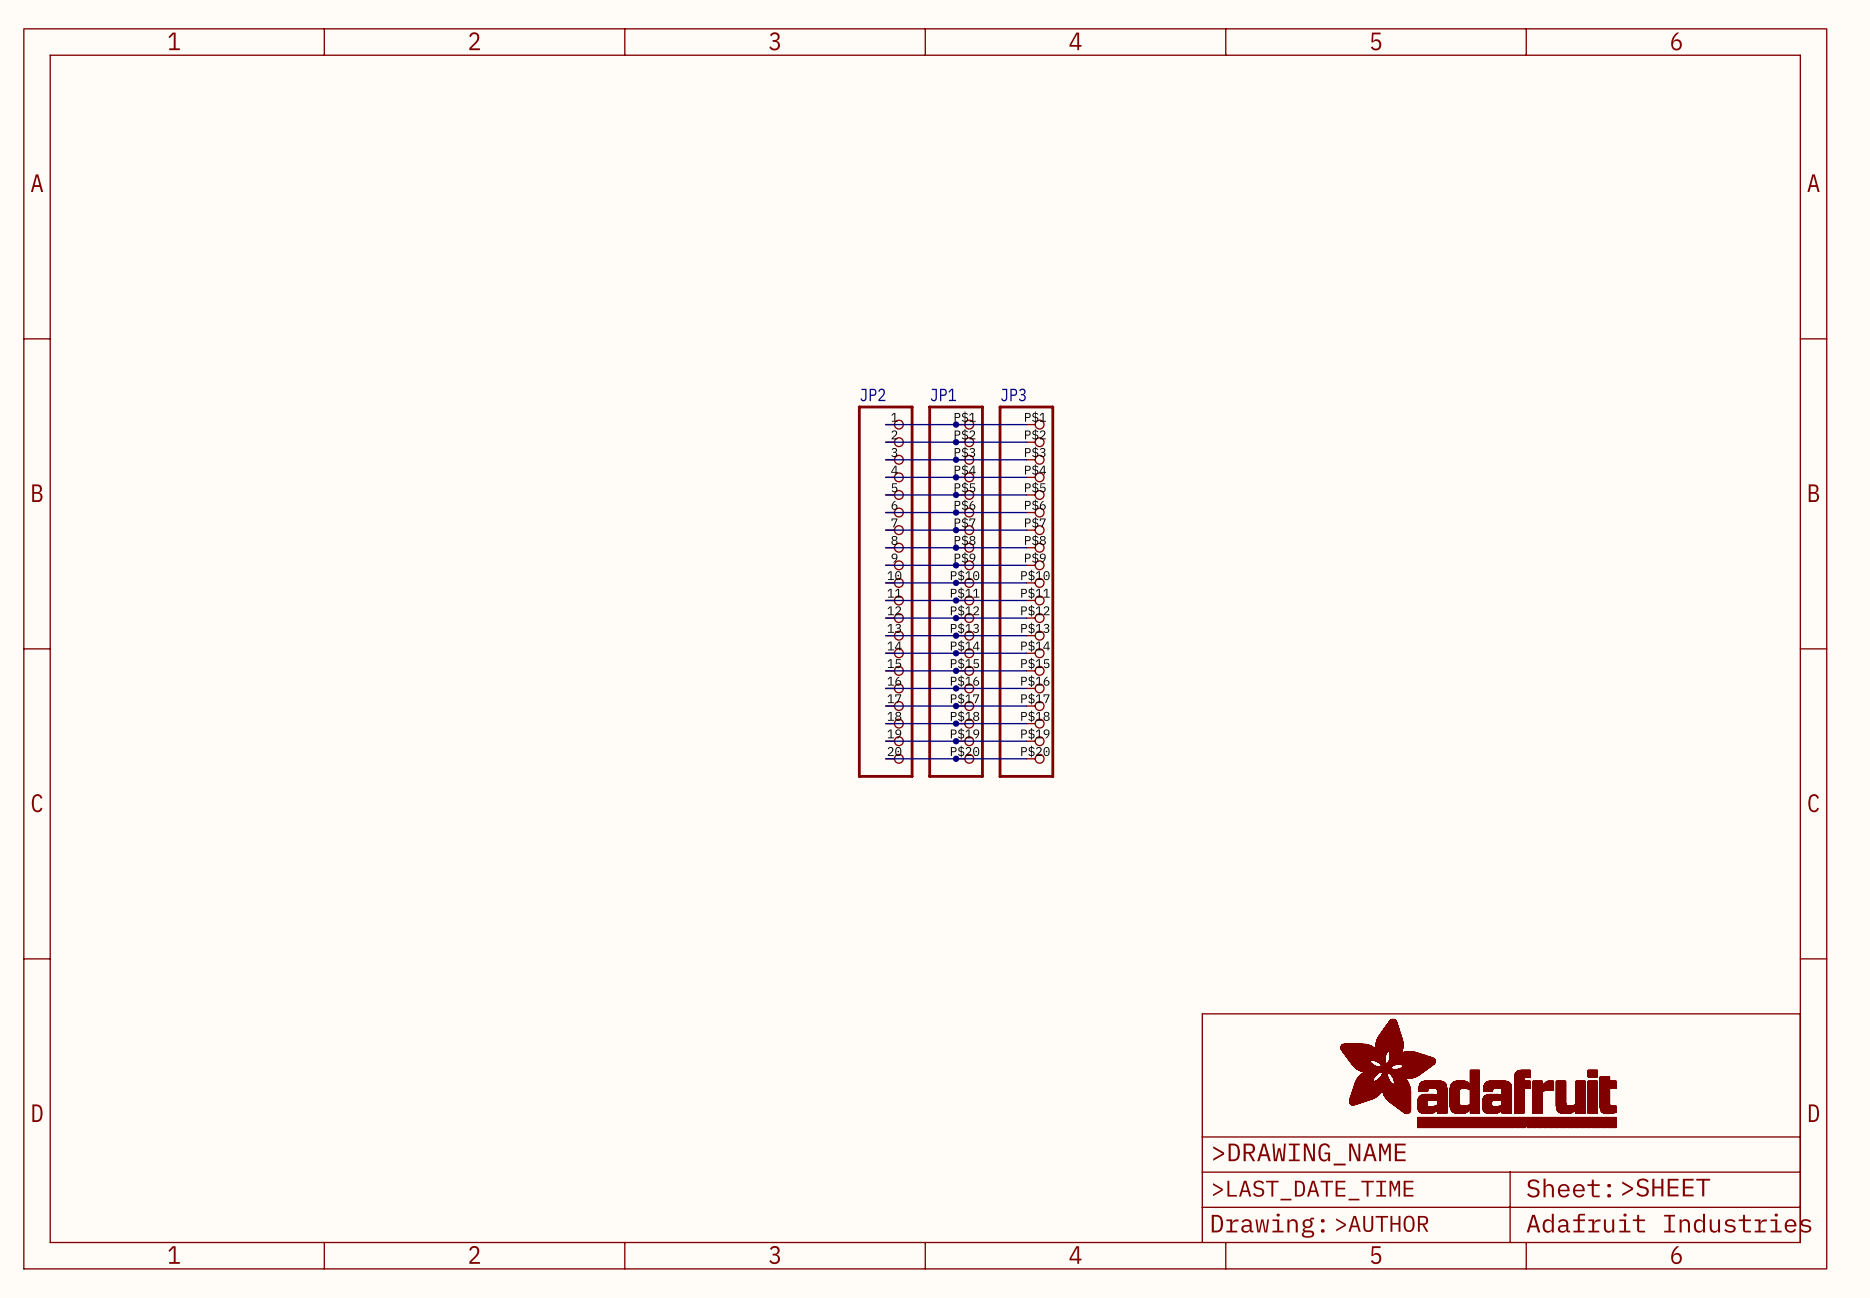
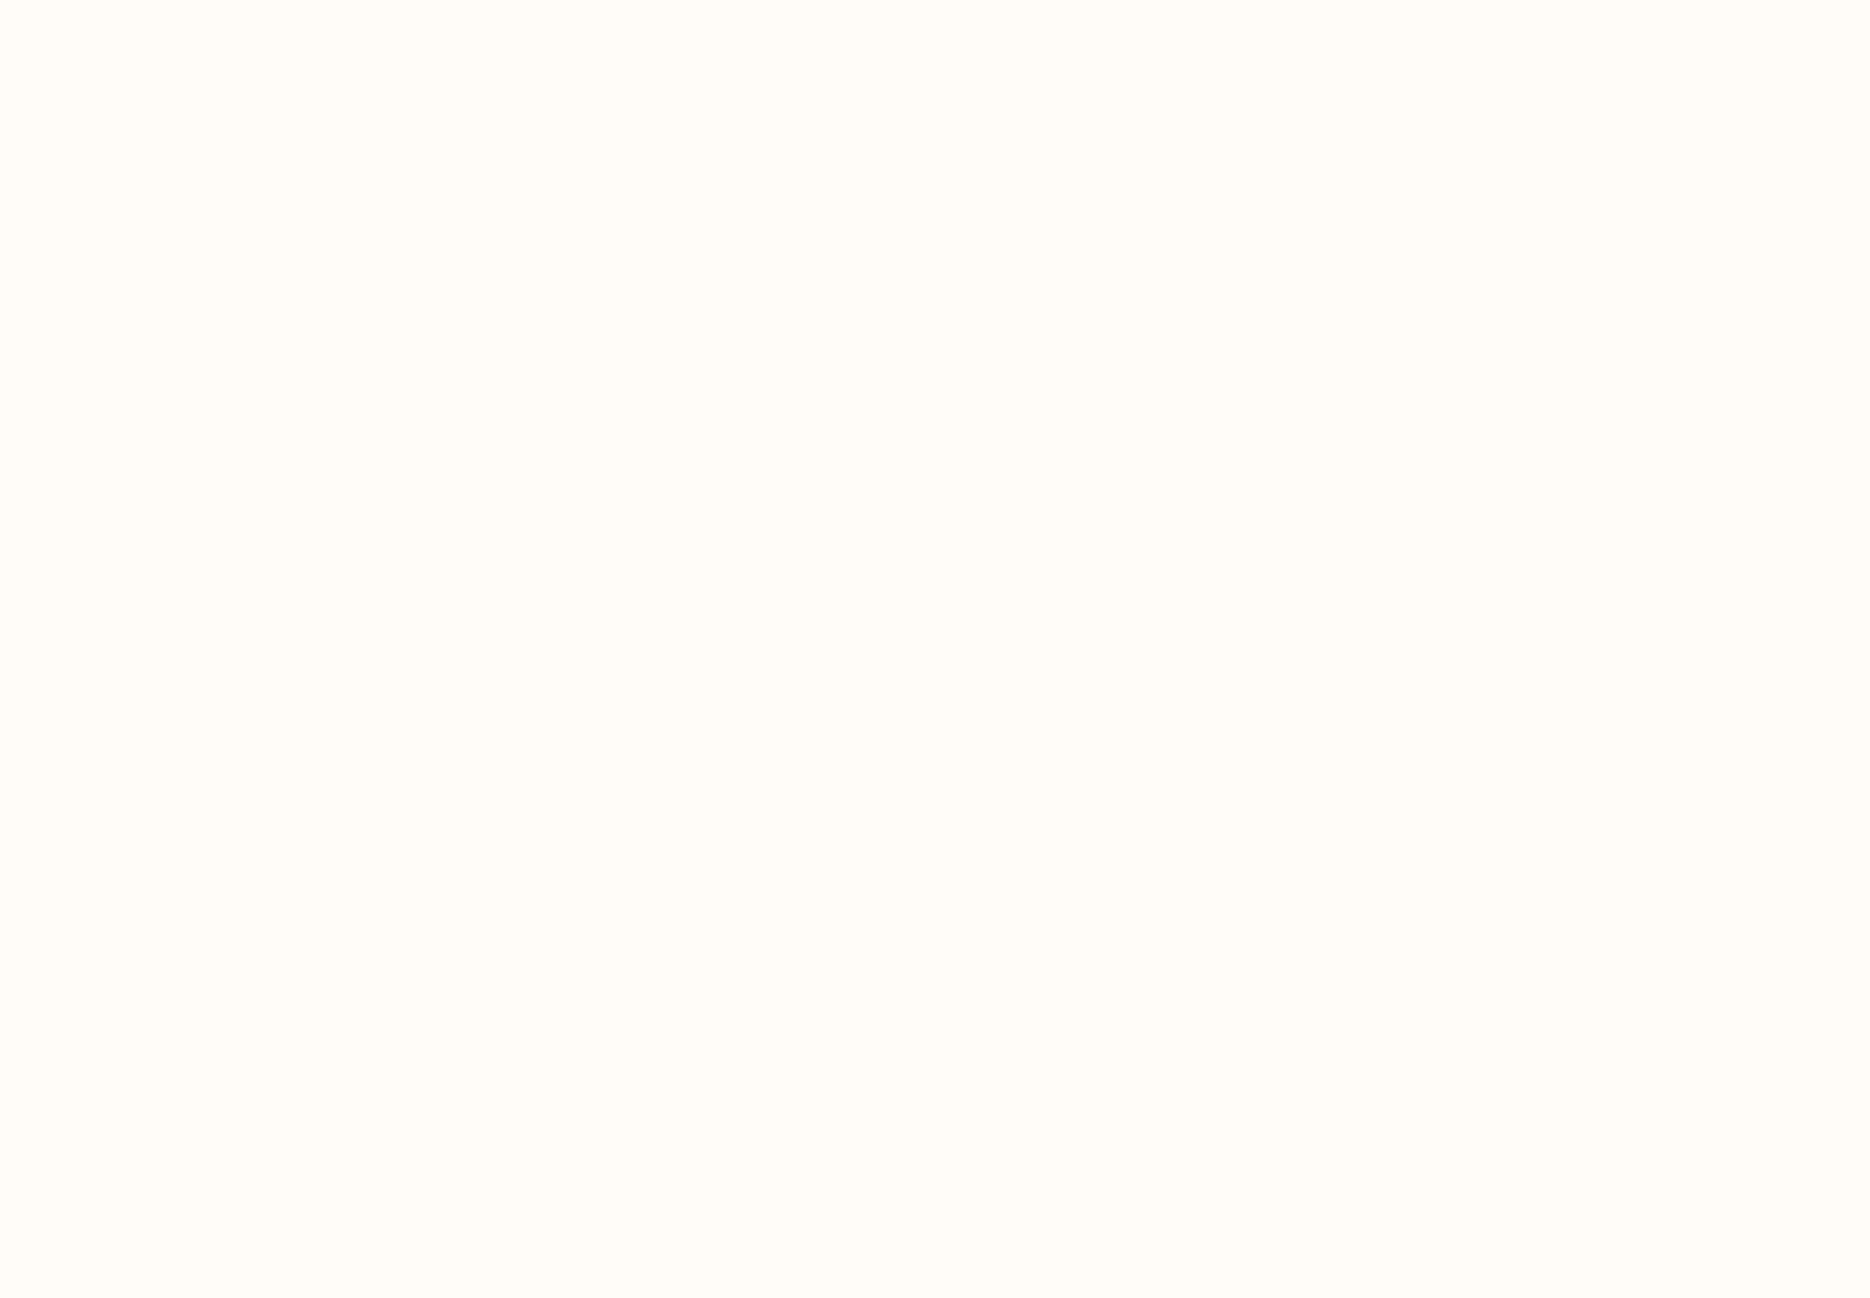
wire: (885, 424) (1026, 424) -> none
junction: (956, 424) -> none
wire: (885, 442) (1026, 442) -> none
junction: (956, 442) -> none
wire: (885, 459) (1026, 459) -> none
junction: (956, 459) -> none
wire: (885, 477) (1026, 477) -> none
junction: (956, 477) -> none
wire: (885, 494) (1026, 494) -> none
junction: (956, 494) -> none
wire: (885, 512) (1026, 512) -> none
junction: (956, 512) -> none
wire: (885, 530) (1026, 530) -> none
junction: (956, 530) -> none
wire: (885, 547) (1026, 547) -> none
junction: (956, 547) -> none
wire: (885, 565) (1026, 565) -> none
junction: (956, 565) -> none
wire: (885, 582) (1026, 582) -> none
junction: (956, 582) -> none
JP2: (885, 591) -> none
JP1: (956, 591) -> none
JP3: (1026, 591) -> none
wire: (885, 600) (1026, 600) -> none
junction: (956, 600) -> none
wire: (885, 618) (1026, 618) -> none
junction: (956, 618) -> none
wire: (885, 635) (1026, 635) -> none
junction: (956, 635) -> none
power symbol: (925, 648) -> none
wire: (885, 653) (1026, 653) -> none
junction: (956, 653) -> none
wire: (885, 670) (1026, 670) -> none
junction: (956, 670) -> none
wire: (885, 688) (1026, 688) -> none
junction: (956, 688) -> none
wire: (885, 706) (1026, 706) -> none
junction: (956, 706) -> none
wire: (885, 723) (1026, 723) -> none
junction: (956, 723) -> none
wire: (885, 741) (1026, 741) -> none
junction: (956, 741) -> none
wire: (885, 758) (1026, 758) -> none
junction: (956, 758) -> none

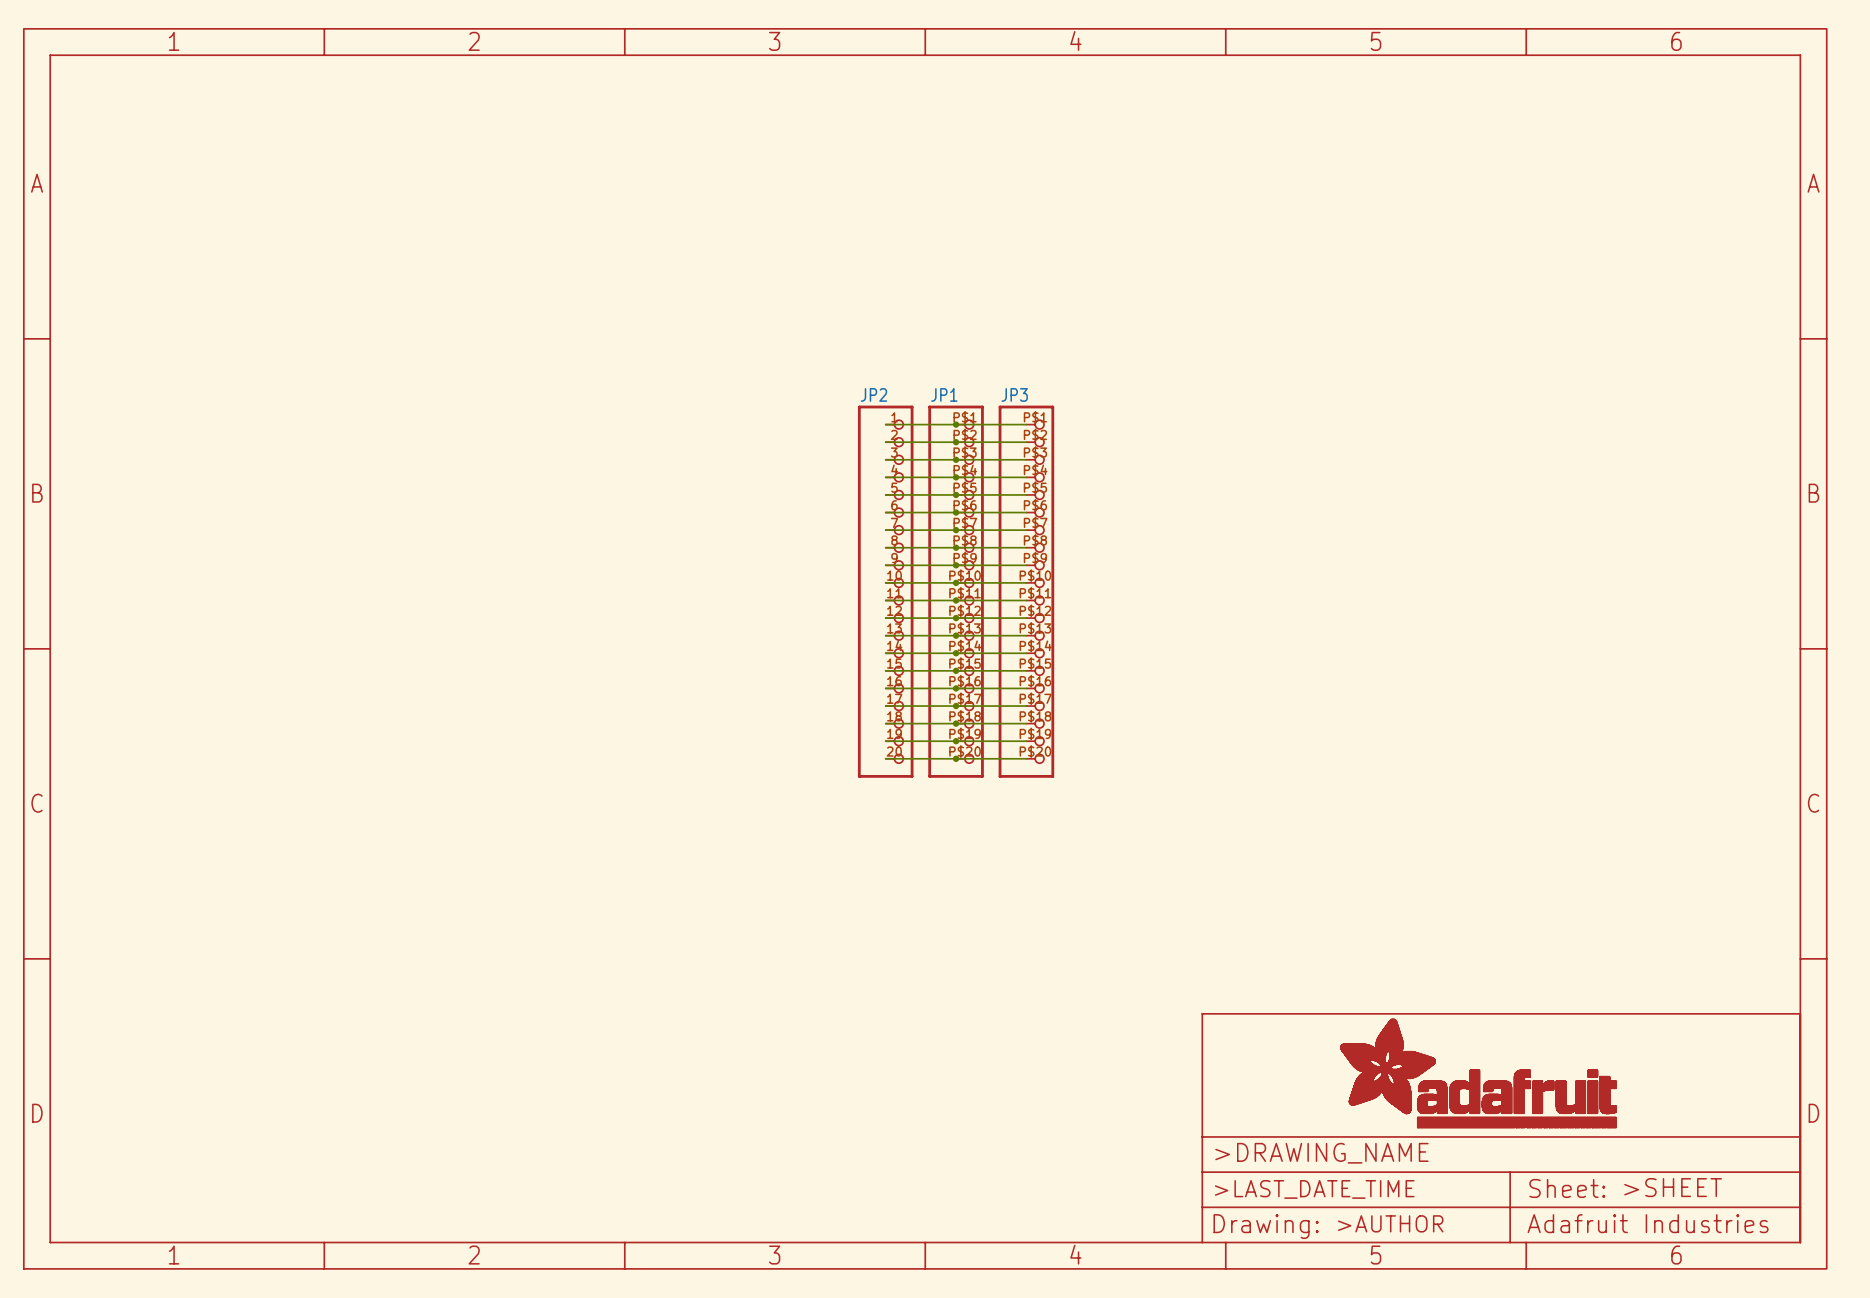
wire: none -> (885, 424) (1026, 424)
junction: none -> (956, 424)
wire: none -> (885, 442) (1026, 442)
junction: none -> (956, 442)
wire: none -> (885, 459) (1026, 459)
junction: none -> (956, 459)
wire: none -> (885, 477) (1026, 477)
junction: none -> (956, 477)
wire: none -> (885, 494) (1026, 494)
junction: none -> (956, 494)
wire: none -> (885, 512) (1026, 512)
junction: none -> (956, 512)
wire: none -> (885, 530) (1026, 530)
junction: none -> (956, 530)
wire: none -> (885, 547) (1026, 547)
junction: none -> (956, 547)
wire: none -> (885, 565) (1026, 565)
junction: none -> (956, 565)
wire: none -> (885, 582) (1026, 582)
junction: none -> (956, 582)
JP2: none -> (885, 591)
JP1: none -> (956, 591)
JP3: none -> (1026, 591)
wire: none -> (885, 600) (1026, 600)
junction: none -> (956, 600)
wire: none -> (885, 618) (1026, 618)
junction: none -> (956, 618)
wire: none -> (885, 635) (1026, 635)
junction: none -> (956, 635)
power symbol: none -> (925, 648)
wire: none -> (885, 653) (1026, 653)
junction: none -> (956, 653)
wire: none -> (885, 670) (1026, 670)
junction: none -> (956, 670)
wire: none -> (885, 688) (1026, 688)
junction: none -> (956, 688)
wire: none -> (885, 706) (1026, 706)
junction: none -> (956, 706)
wire: none -> (885, 723) (1026, 723)
junction: none -> (956, 723)
wire: none -> (885, 741) (1026, 741)
junction: none -> (956, 741)
wire: none -> (885, 758) (1026, 758)
junction: none -> (956, 758)

